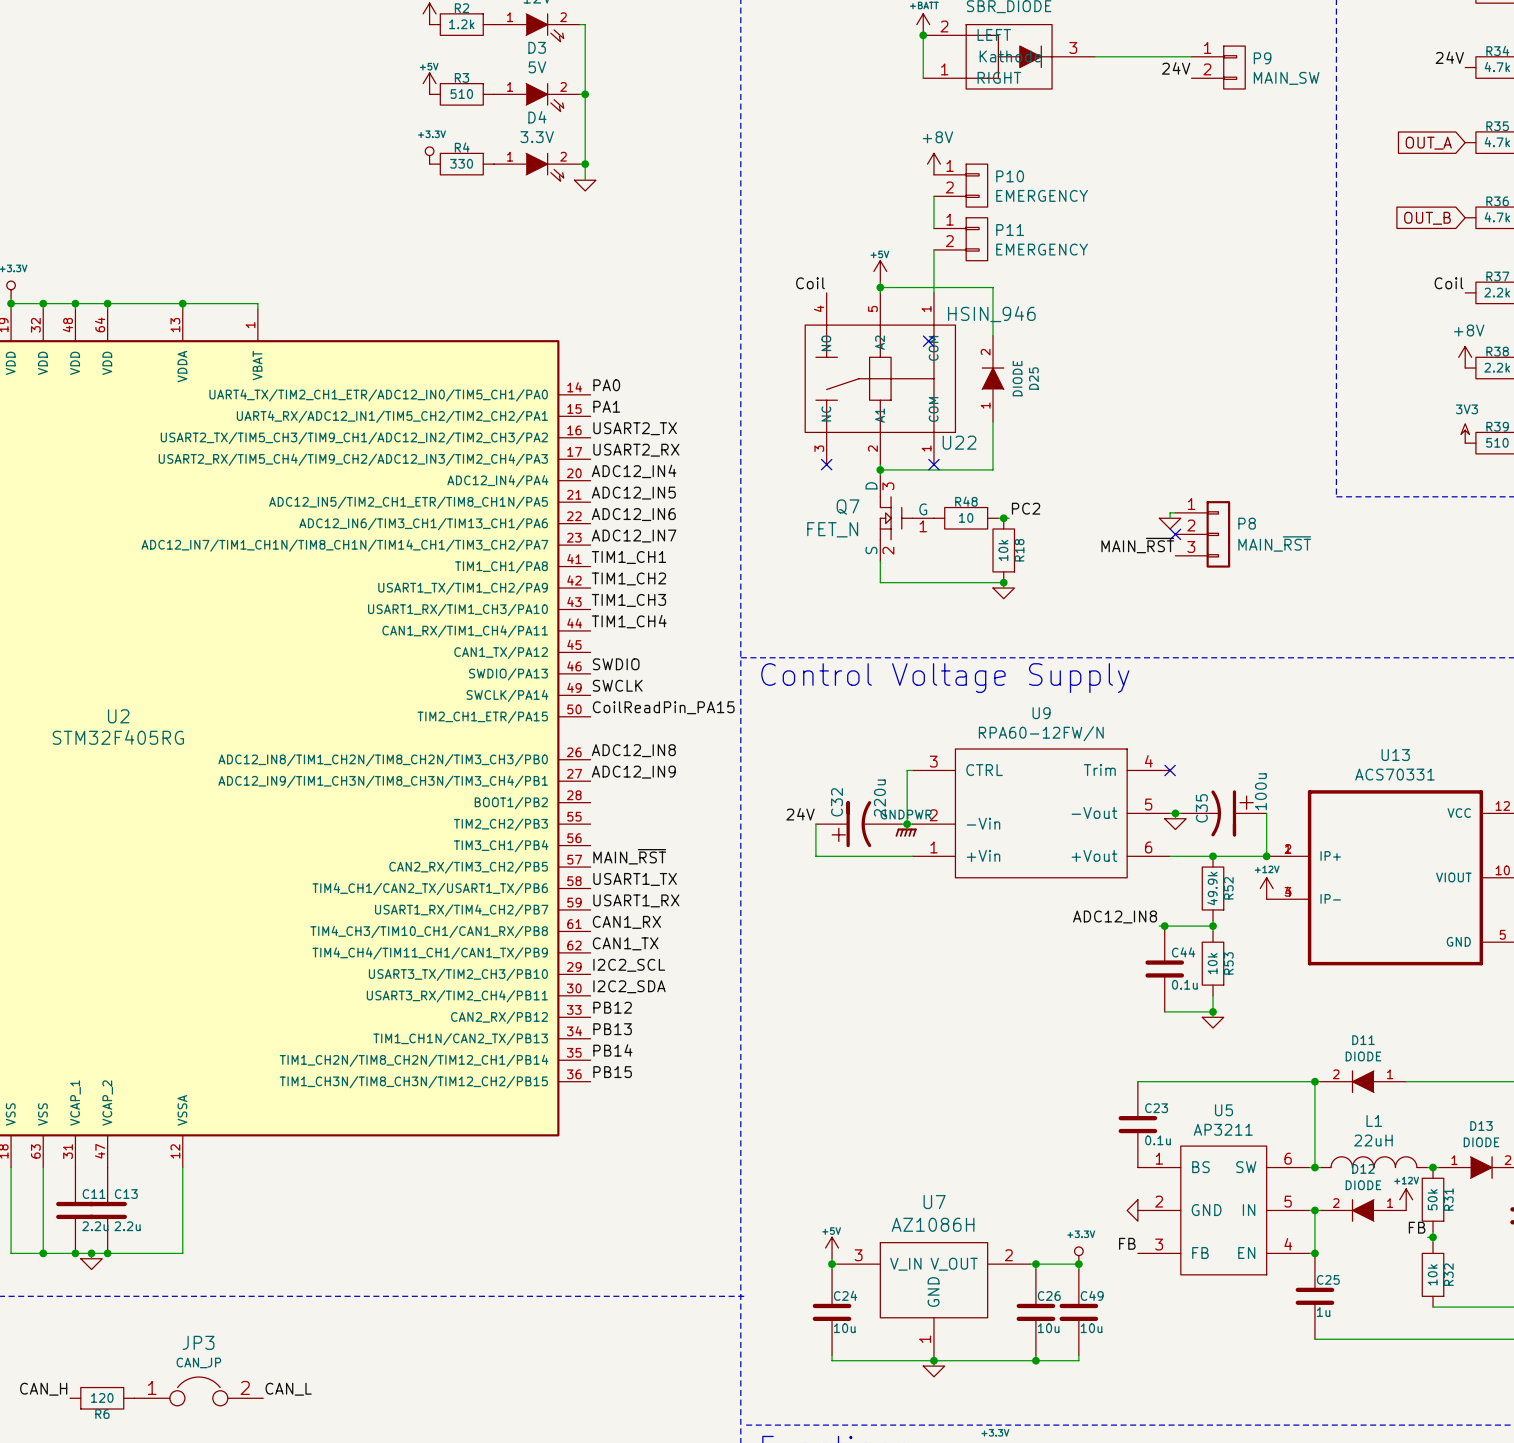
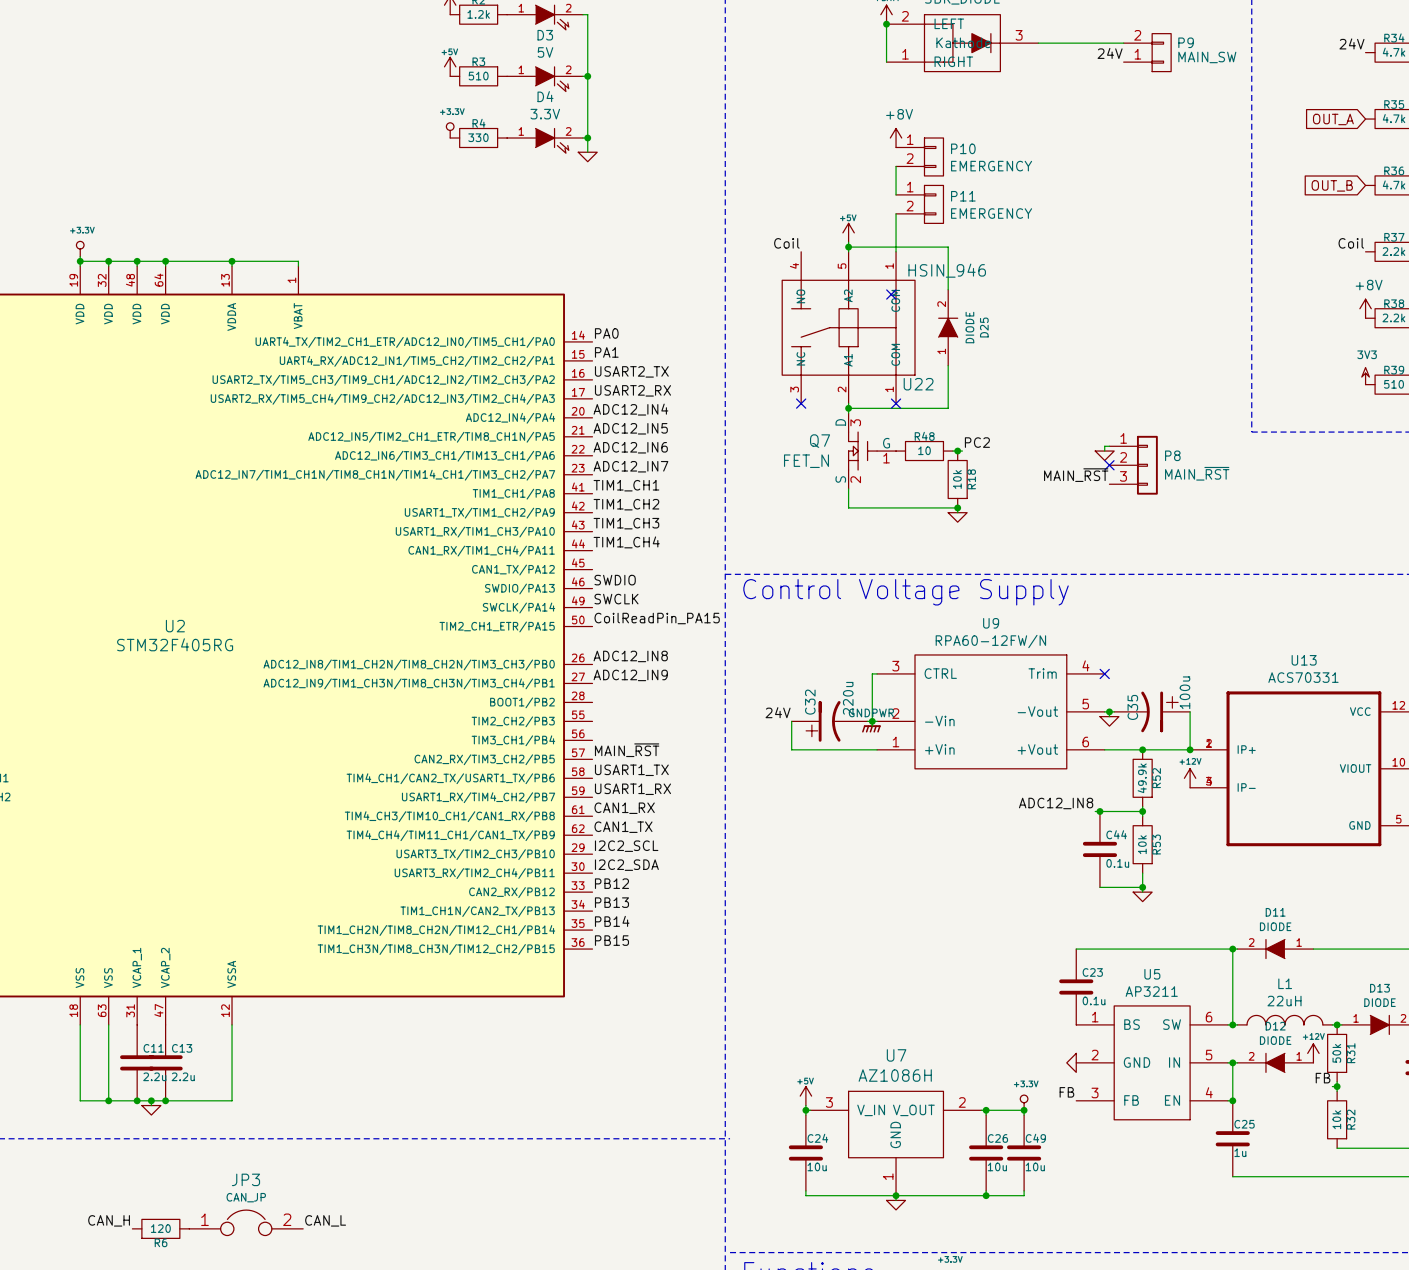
P9 flip: as is (1234, 67) -> up-down (1161, 52)

